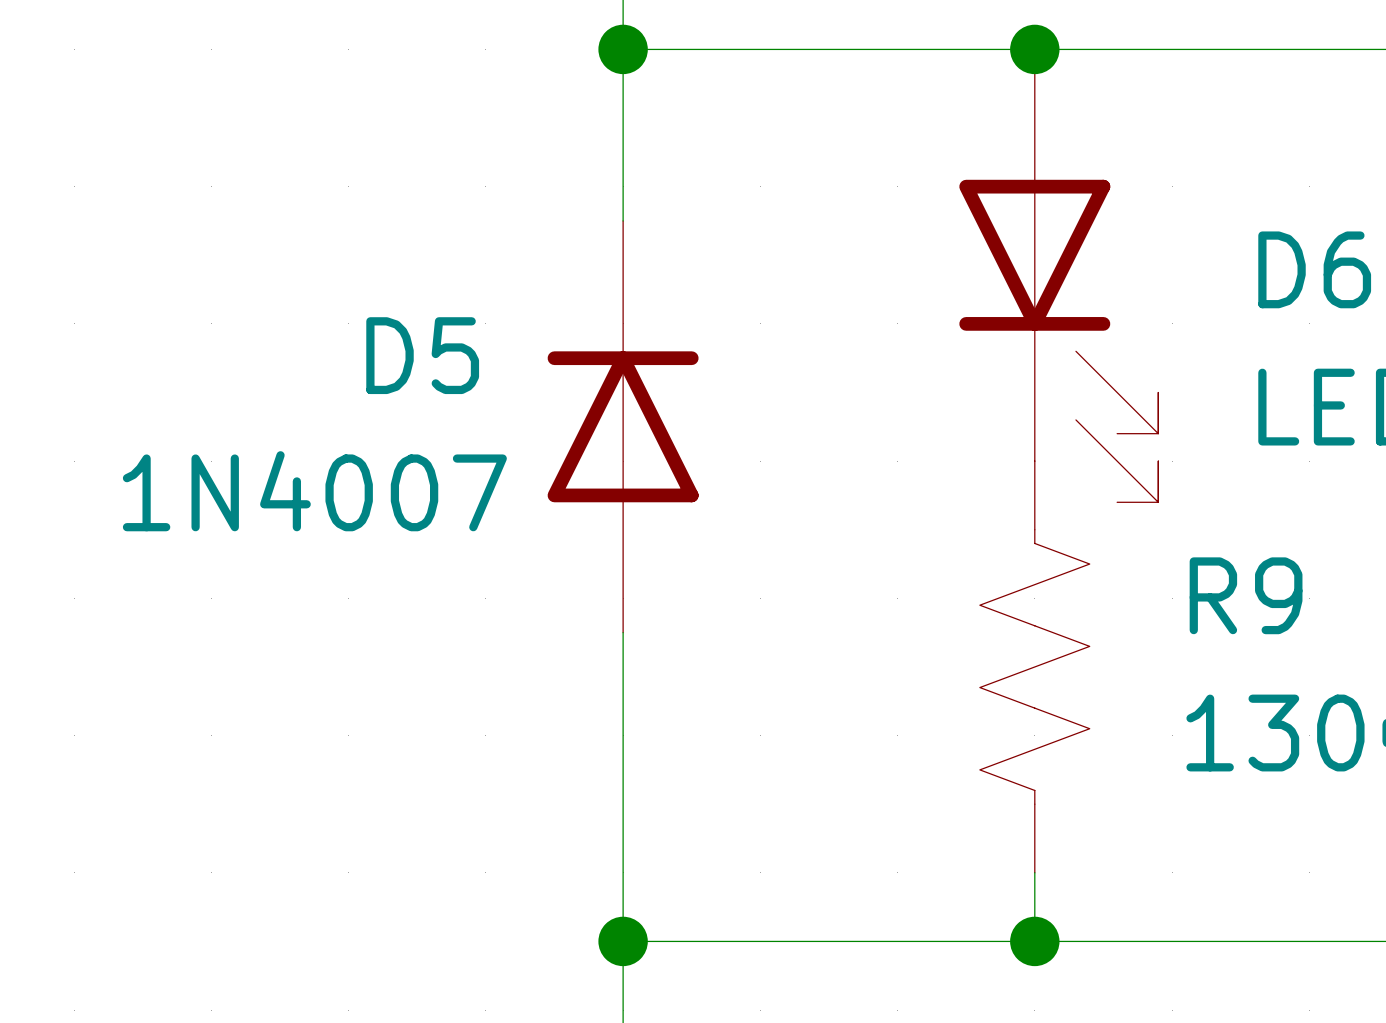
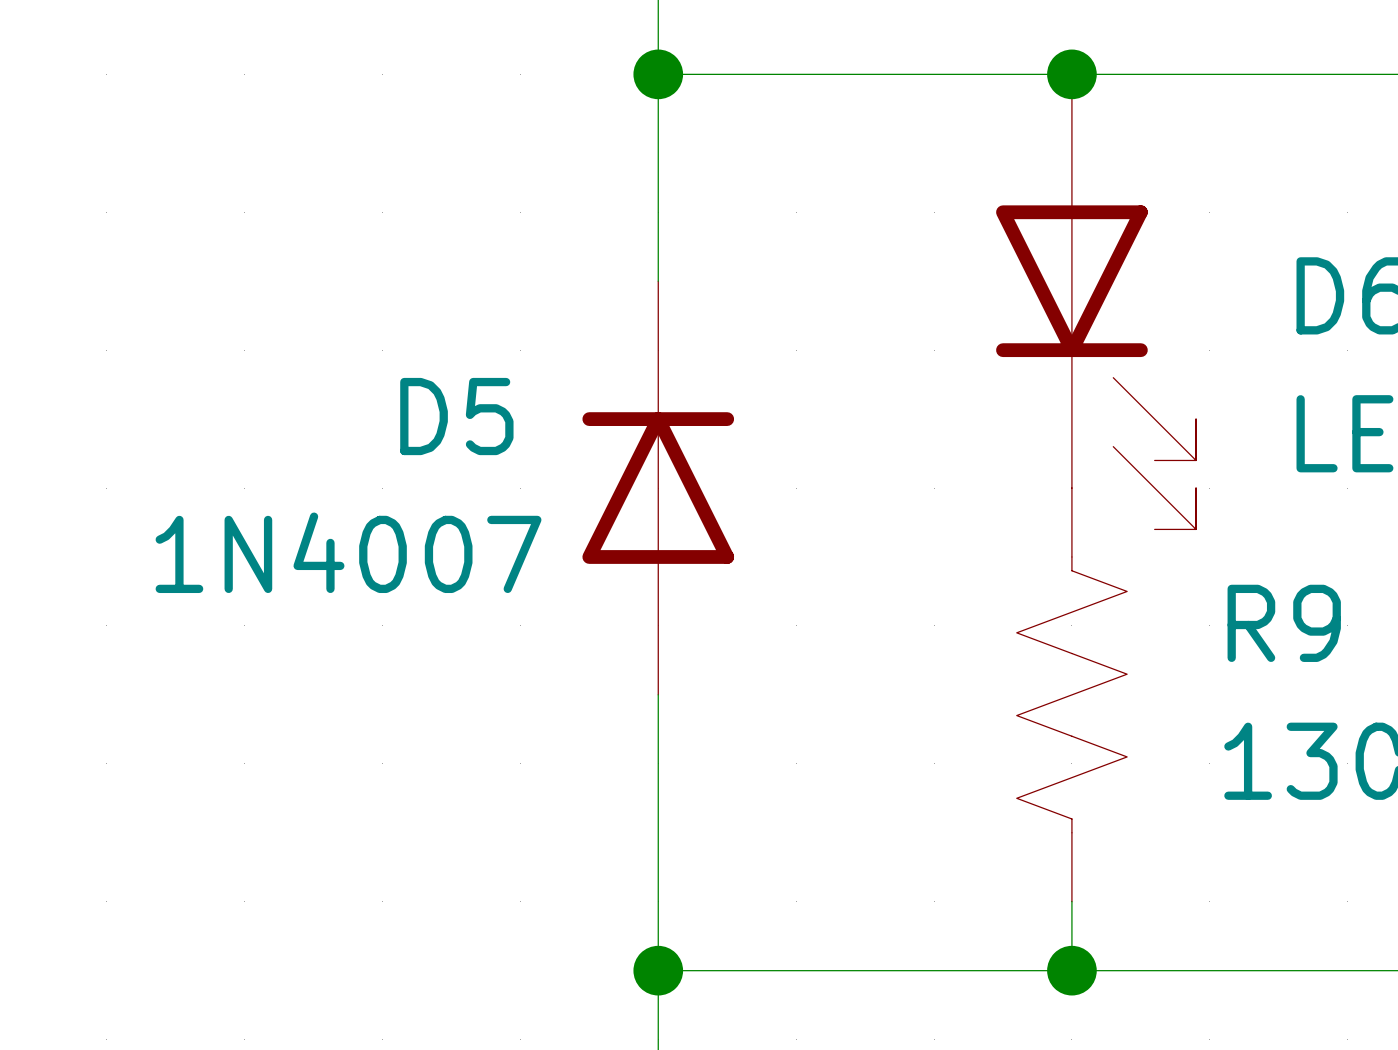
D5 position: (623, 426) -> (658, 488)

